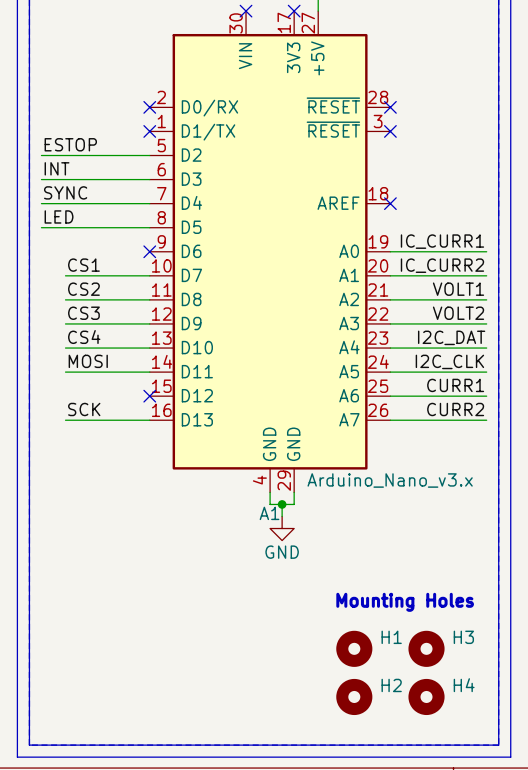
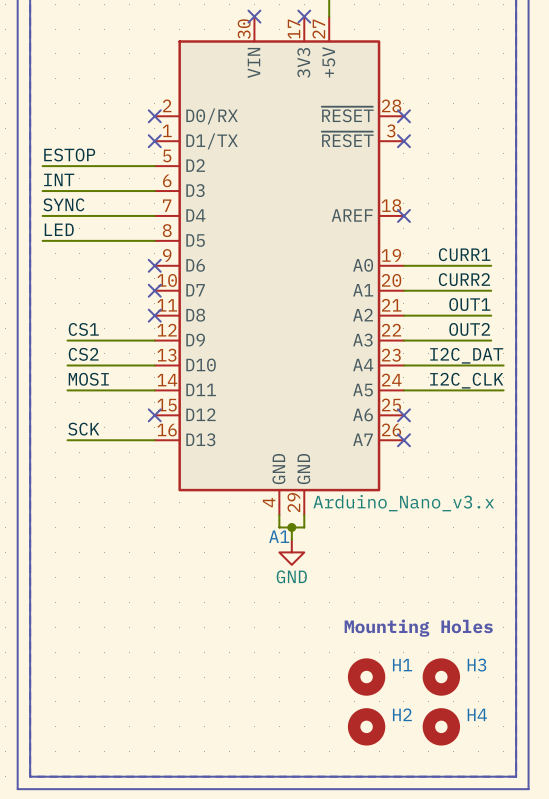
label: IC_CURR1 (442, 241) -> none
wire: (474, 251) (486, 251) -> none
label: CS1 (83, 265) -> none
label: IC_CURR2 (442, 265) -> none
wire: (65, 275) (149, 275) -> none
no-connect mark: none -> (154, 290)
wire: (474, 275) (486, 275) -> none
label: CS2 (83, 289) -> none
label: VOLT1 (458, 289) -> OUT1 (469, 304)
wire: (65, 299) (149, 299) -> none
no-connect mark: none -> (154, 315)
wire: (474, 299) (486, 299) -> none
label: CS3 (83, 313) -> CS1 (83, 329)
label: VOLT2 (458, 313) -> OUT2 (469, 329)
wire: (474, 323) (486, 323) -> none
label: CS4 (84, 337) -> CS2 (83, 354)
label position: CURR1 (455, 385) -> CURR1 (464, 254)
wire: (390, 396) (486, 396) -> none
no-connect mark: none -> (403, 415)
label position: CURR2 (455, 409) -> CURR2 (464, 279)
wire: (390, 420) (486, 420) -> none
no-connect mark: none -> (403, 440)

